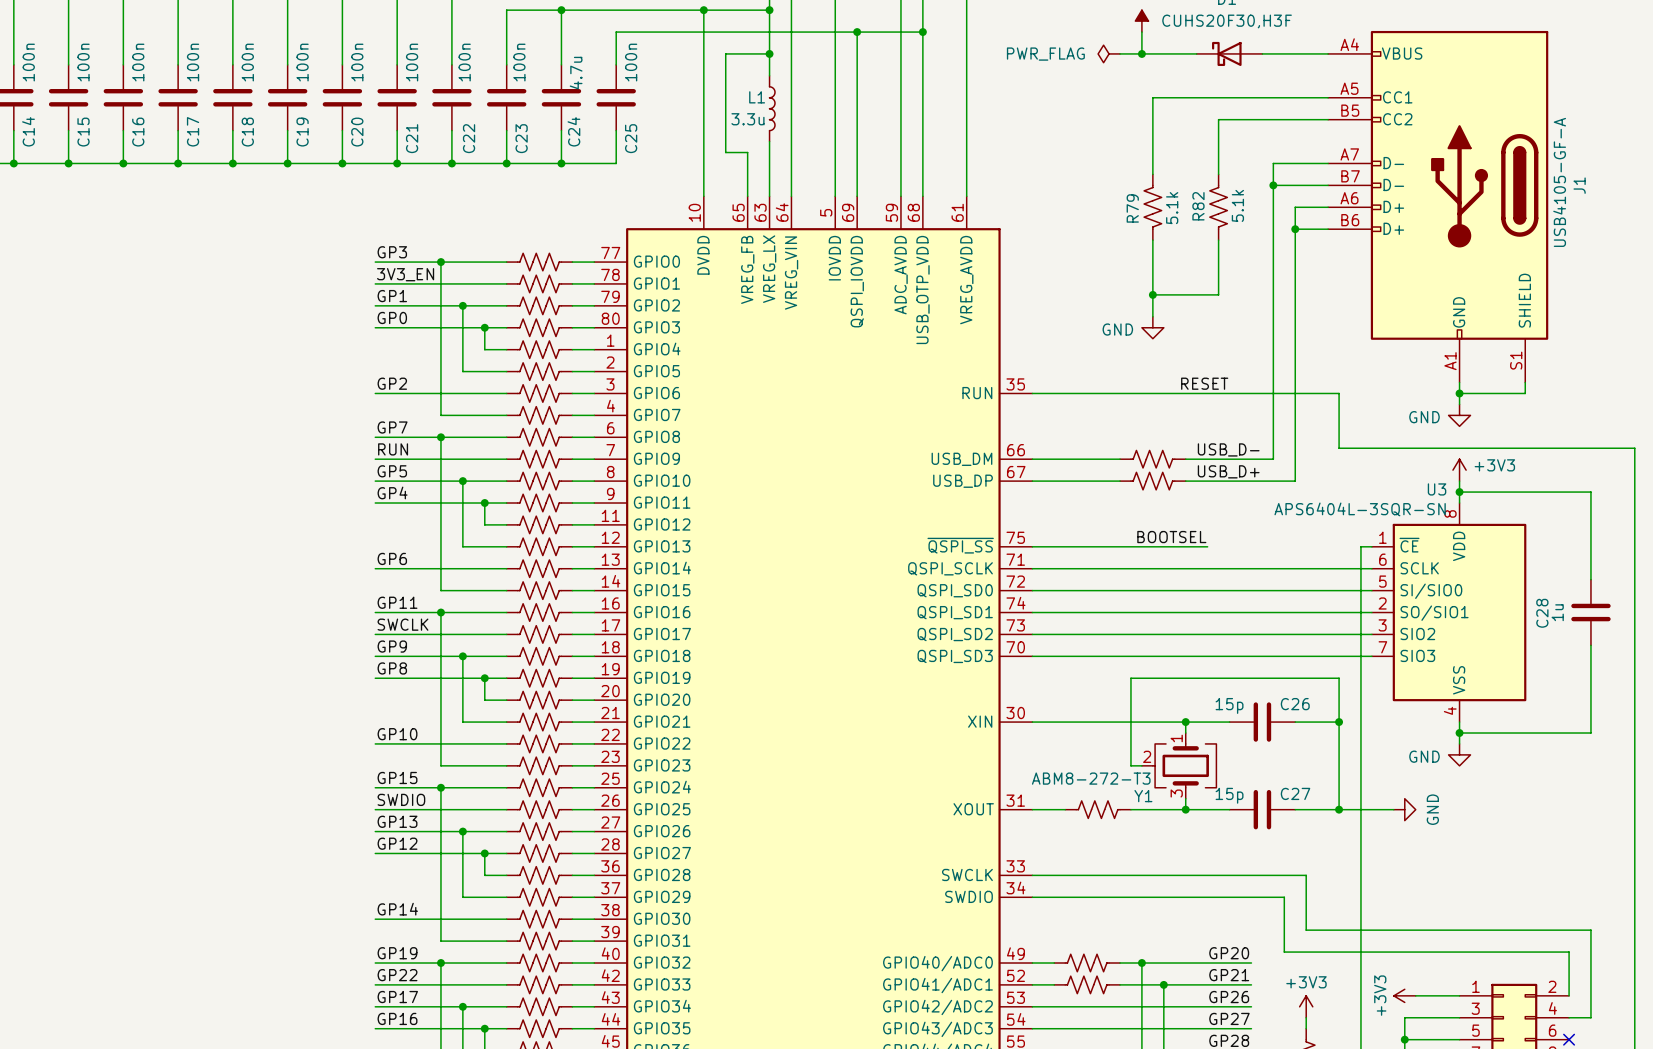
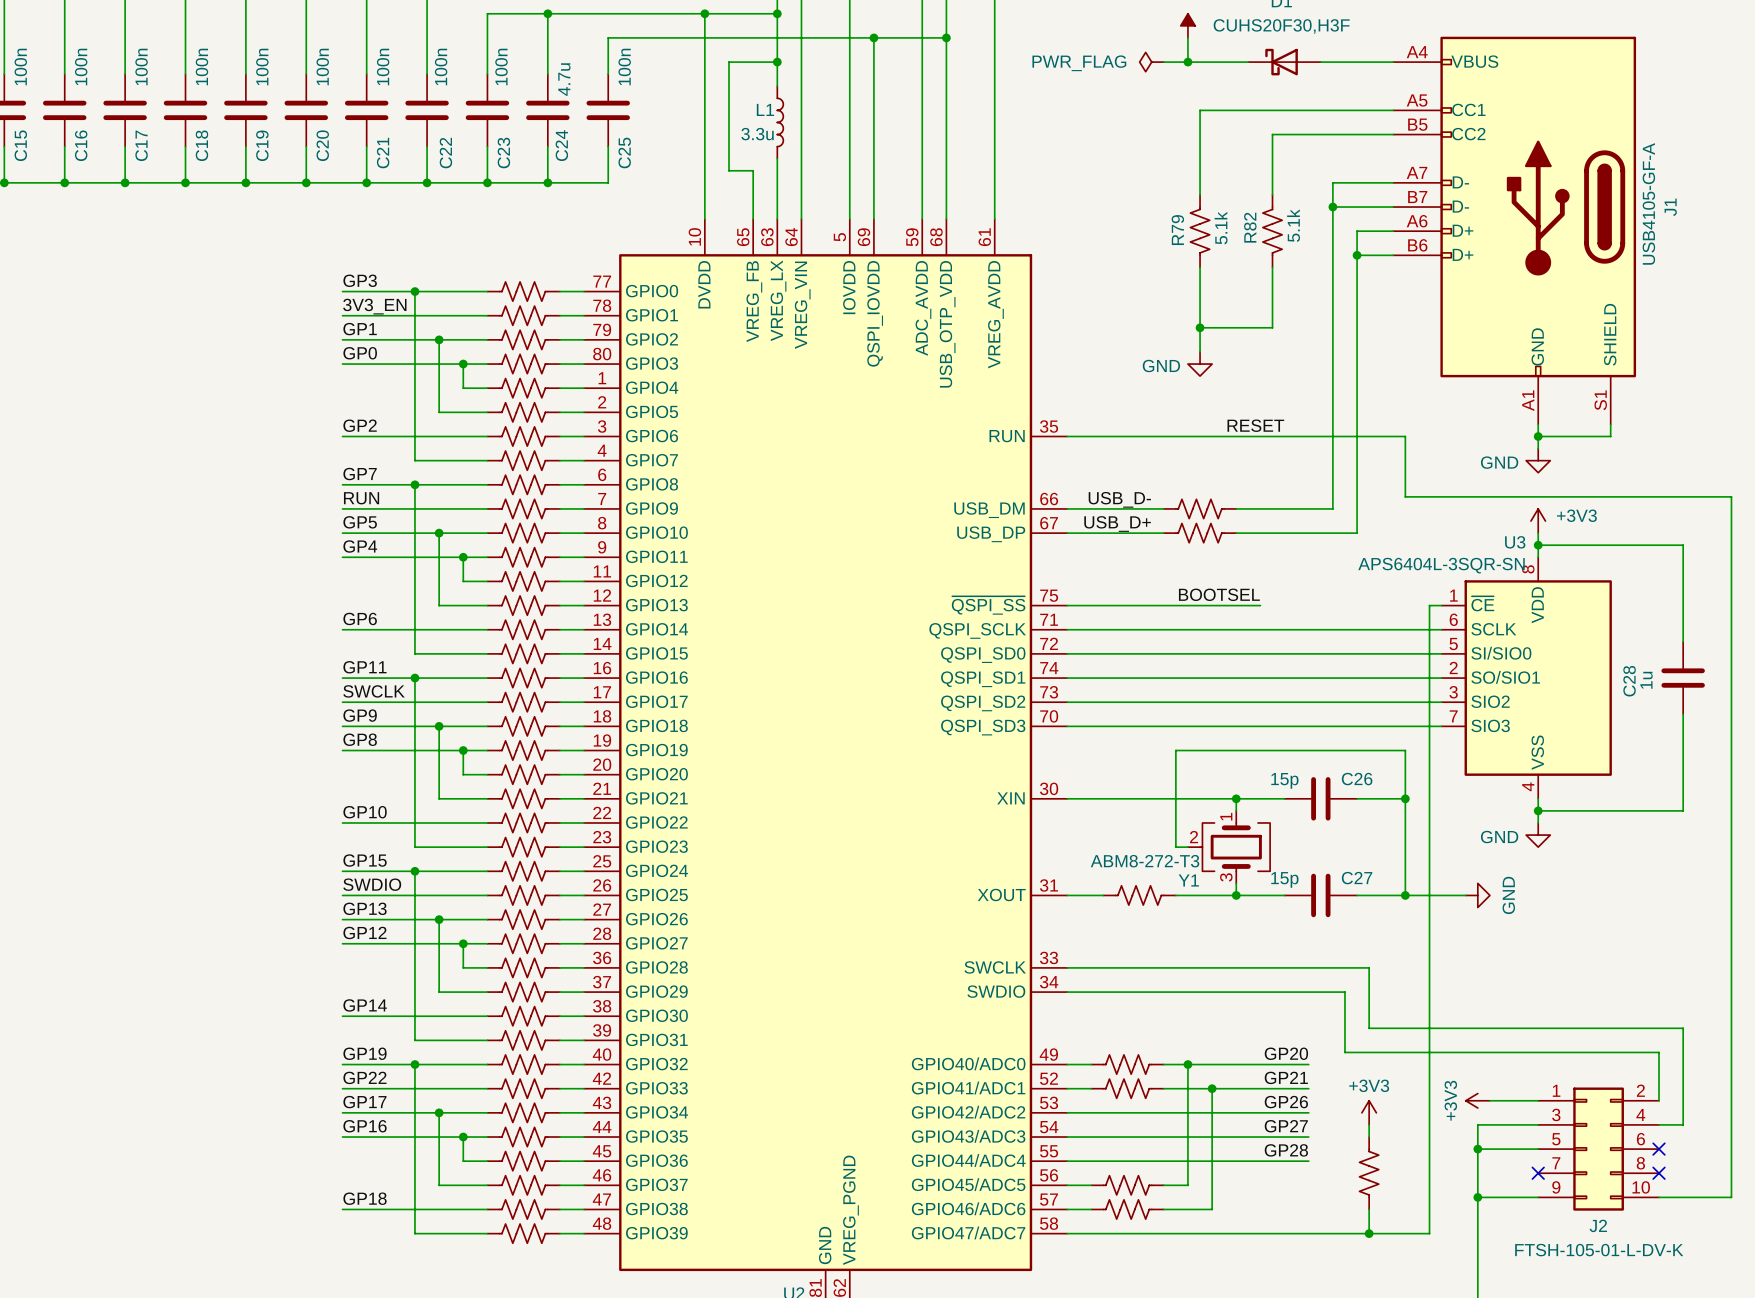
label position: USB_D- (1228, 449) -> USB_D- (1119, 499)
label position: USB_D+ (1228, 471) -> USB_D+ (1117, 523)

